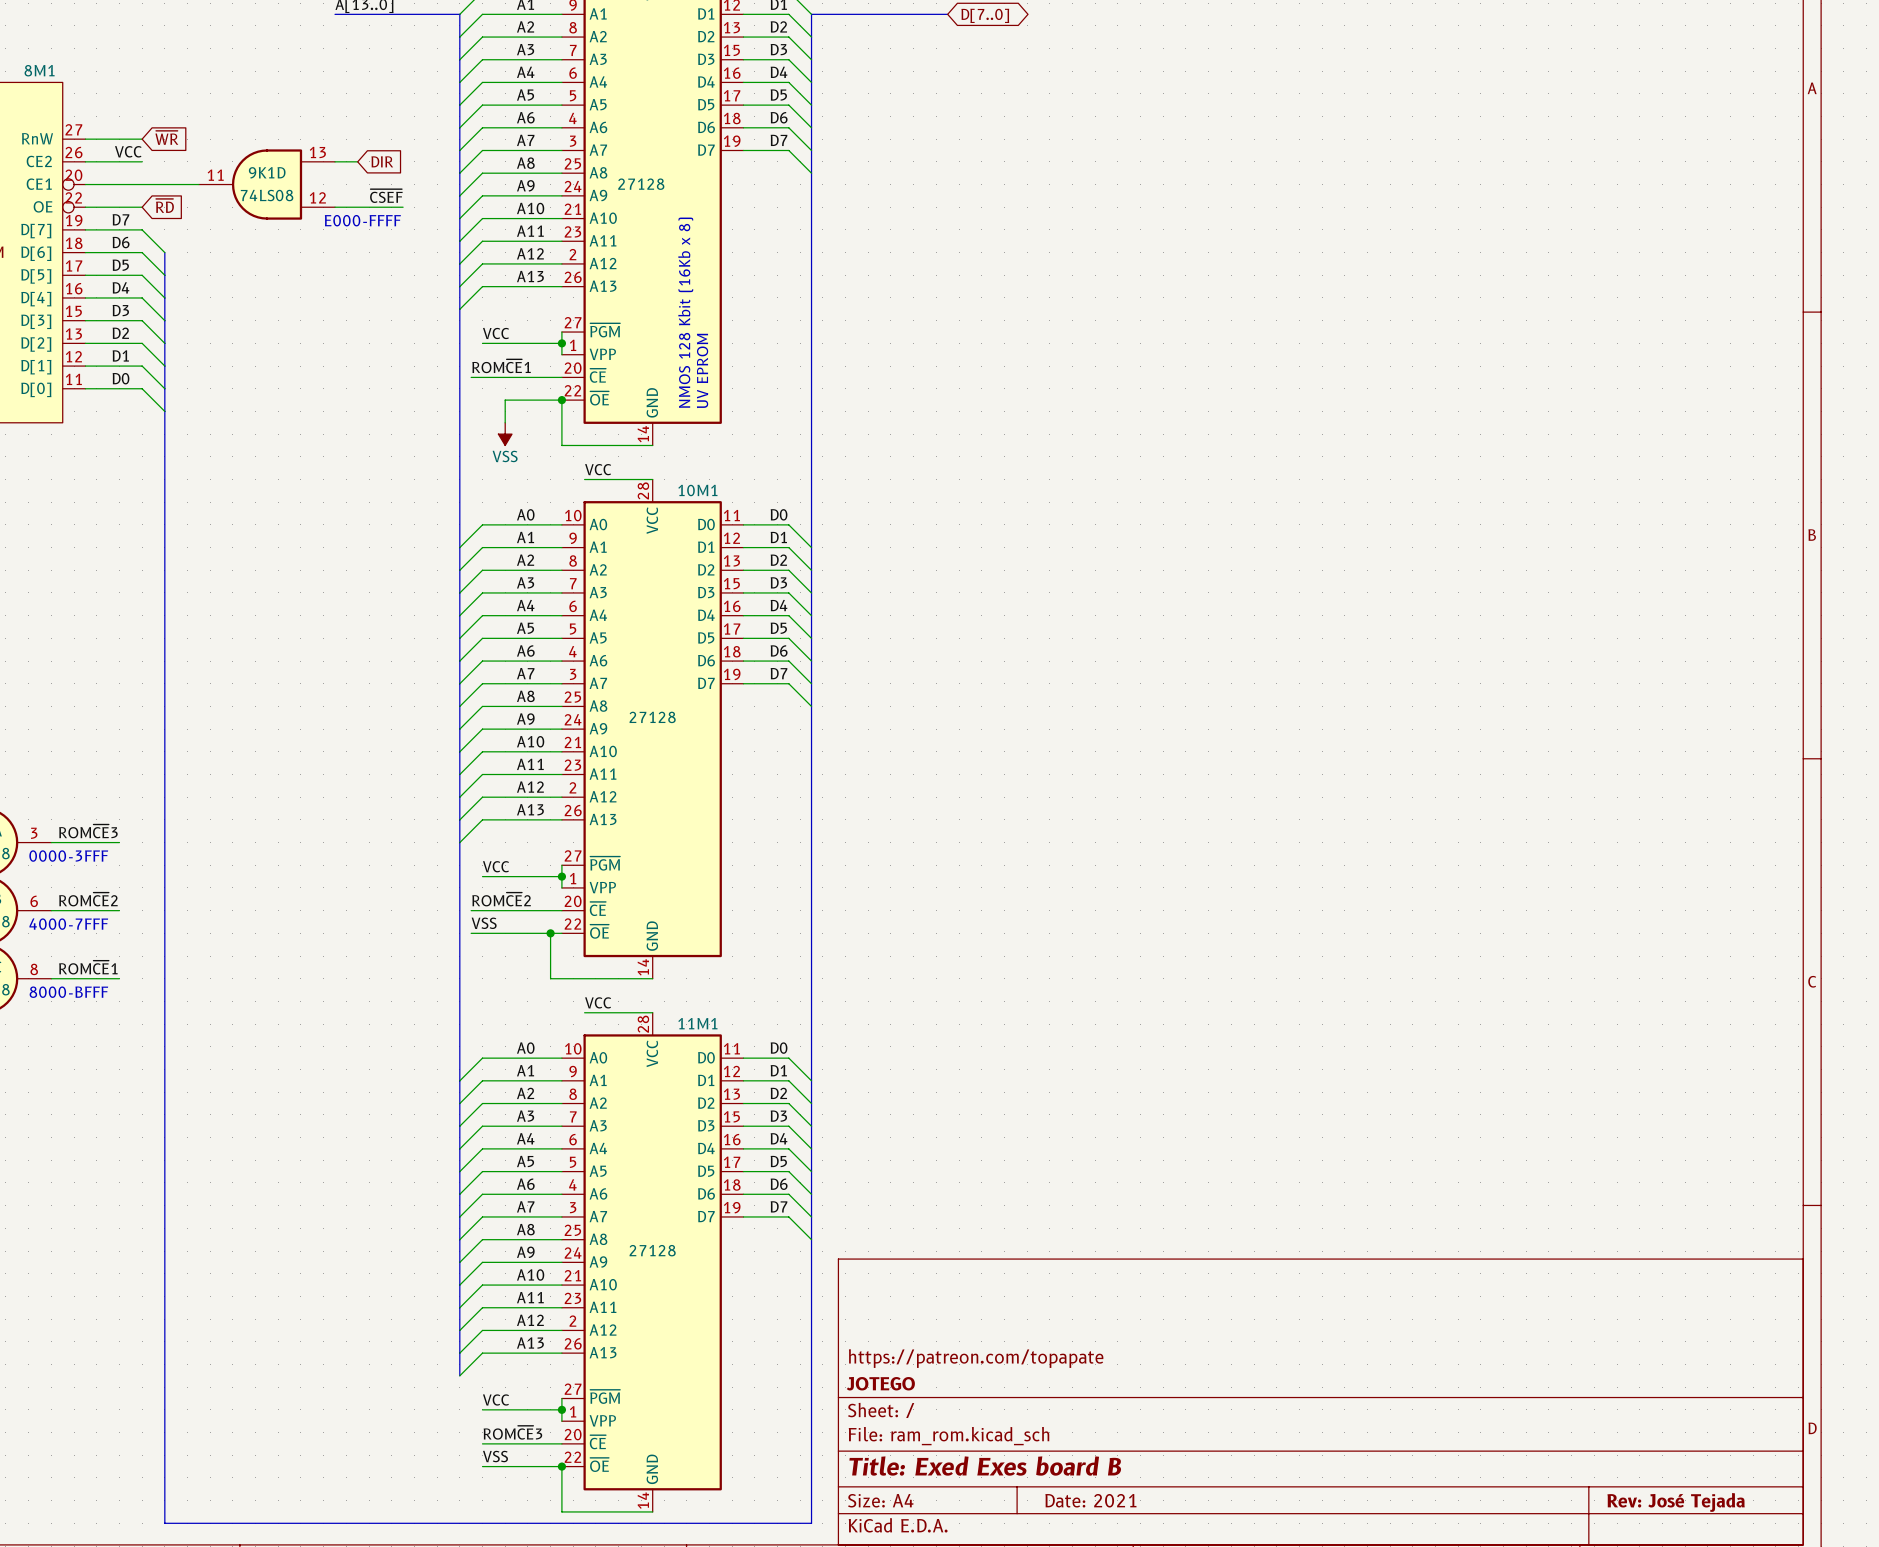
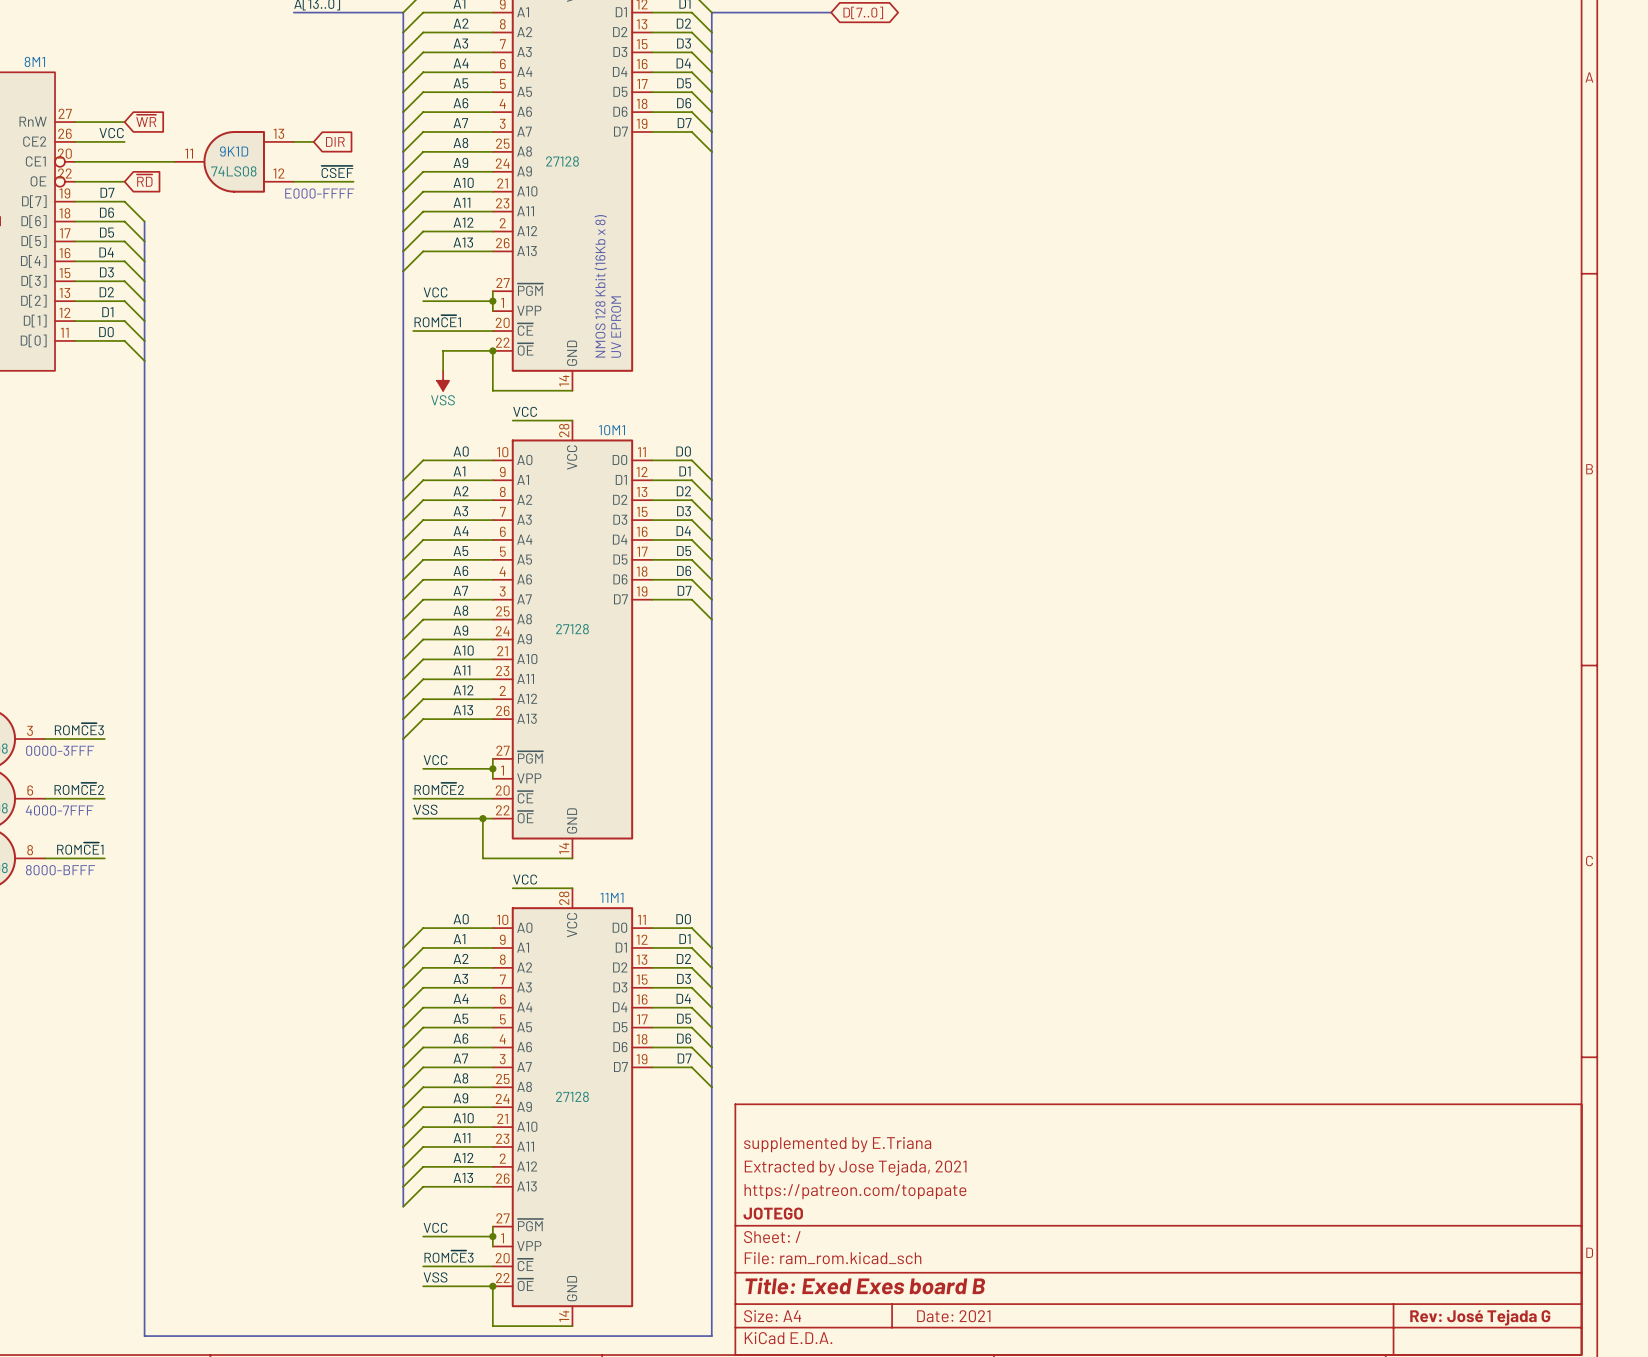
title block: none -> supplemented by E.Triana (837, 1144)
title block: none -> Extracted by Jose Tejada, 2021 (855, 1168)
title block: Rev: José Tejada (1676, 1502) -> Rev: José Tejada G (1480, 1317)

